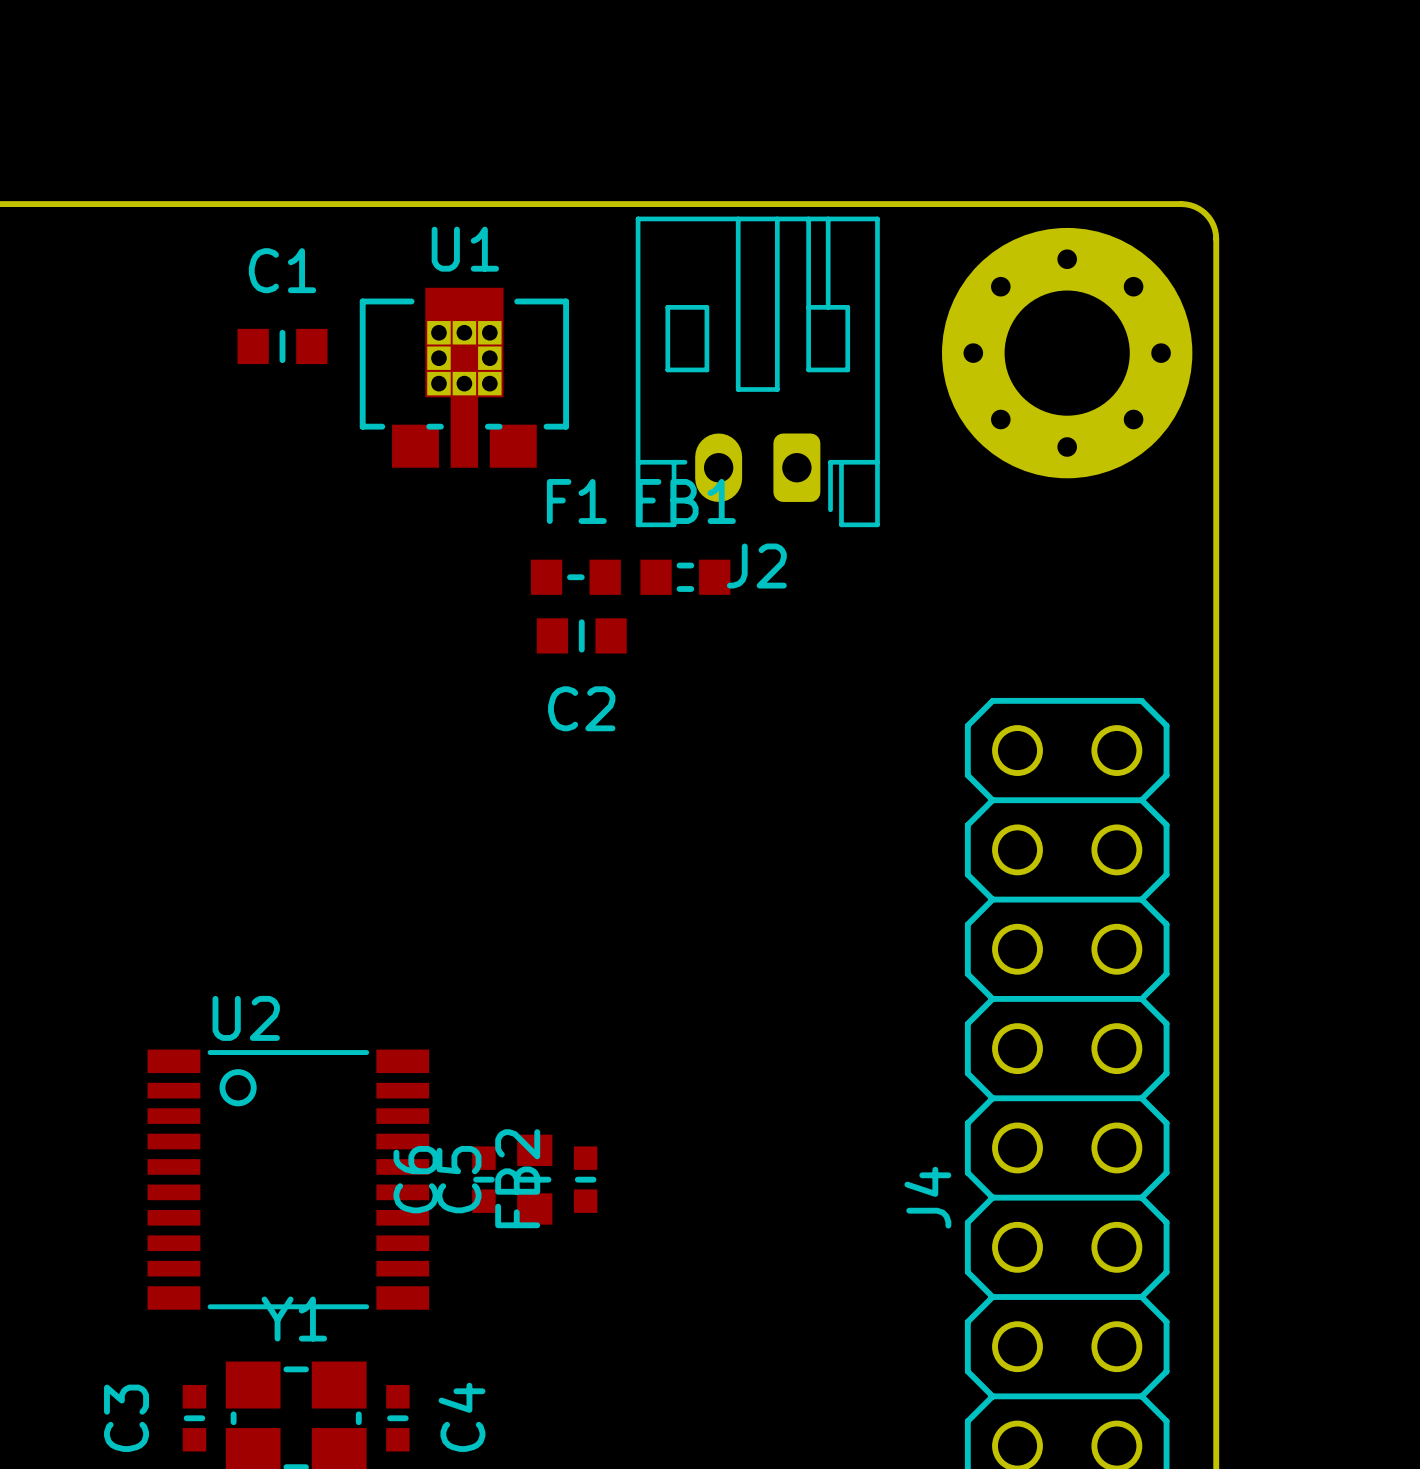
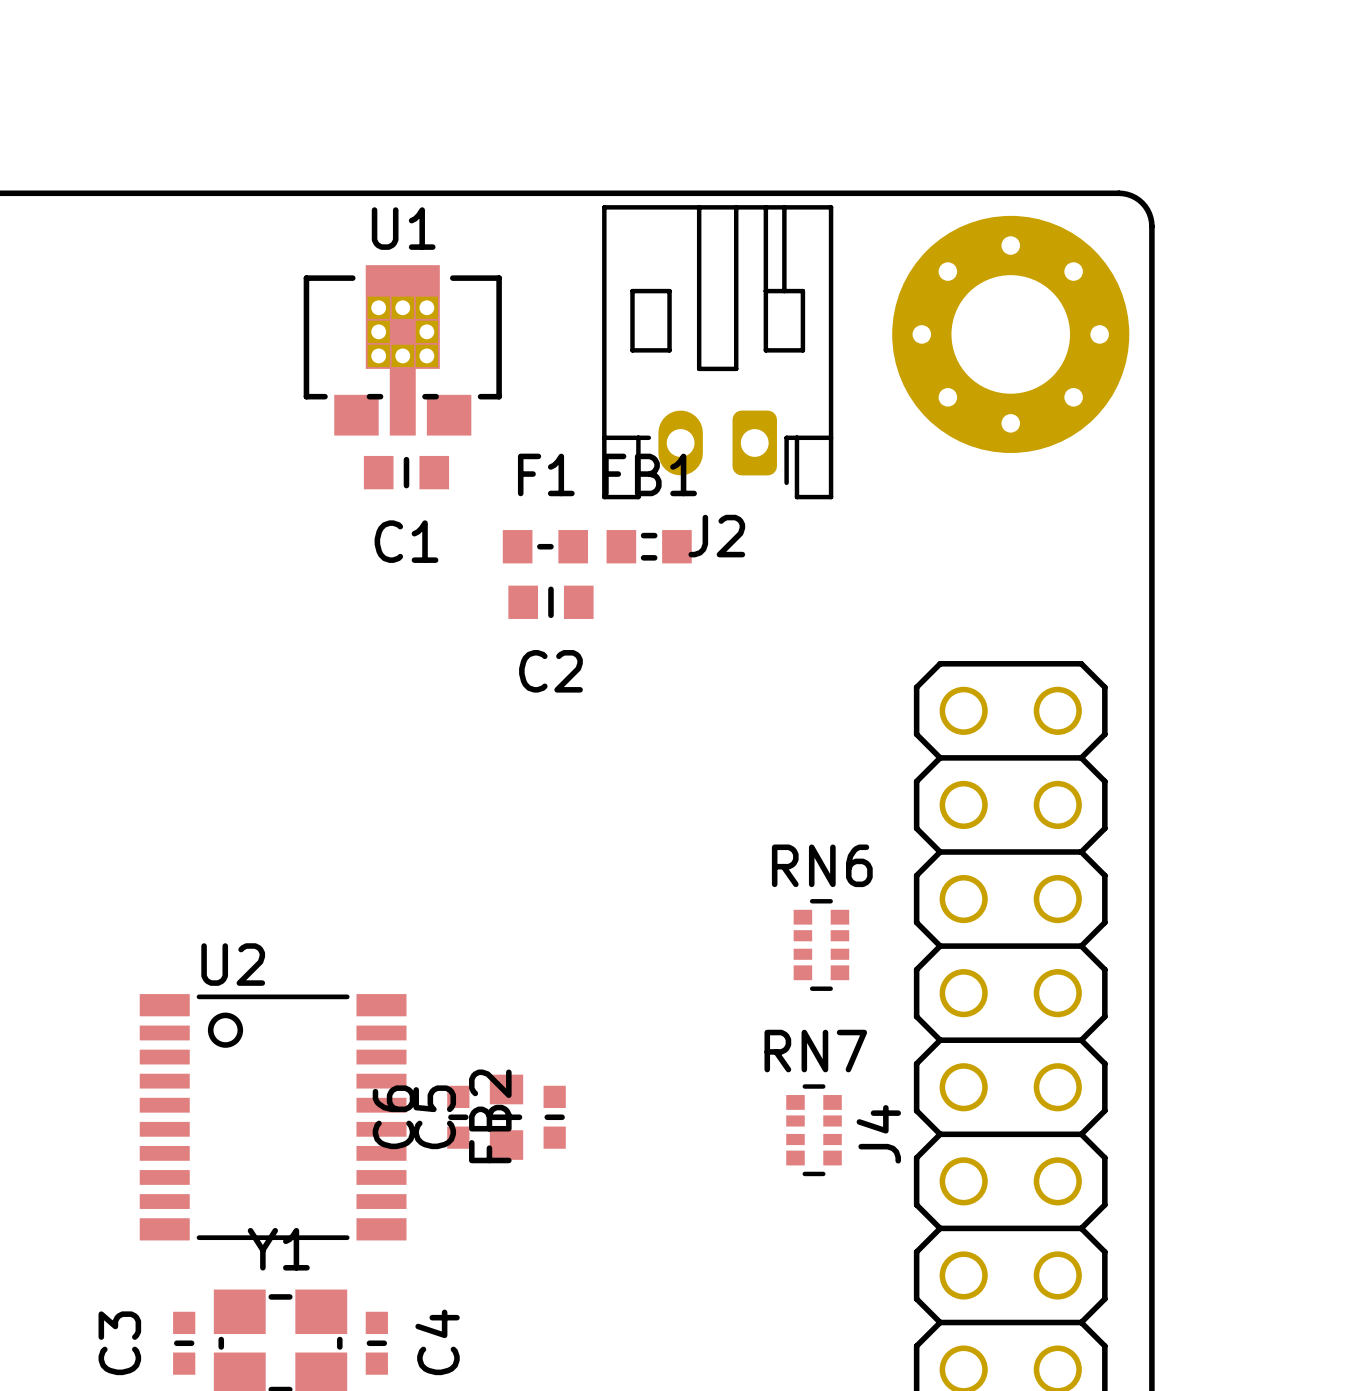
C1 name position: C1 (282, 270) -> C1 (406, 541)
C1 position: (282, 346) -> (406, 472)
U1 position: (464, 377) -> (402, 350)
RN6: none -> (821, 944)
RN7: none -> (814, 1130)

